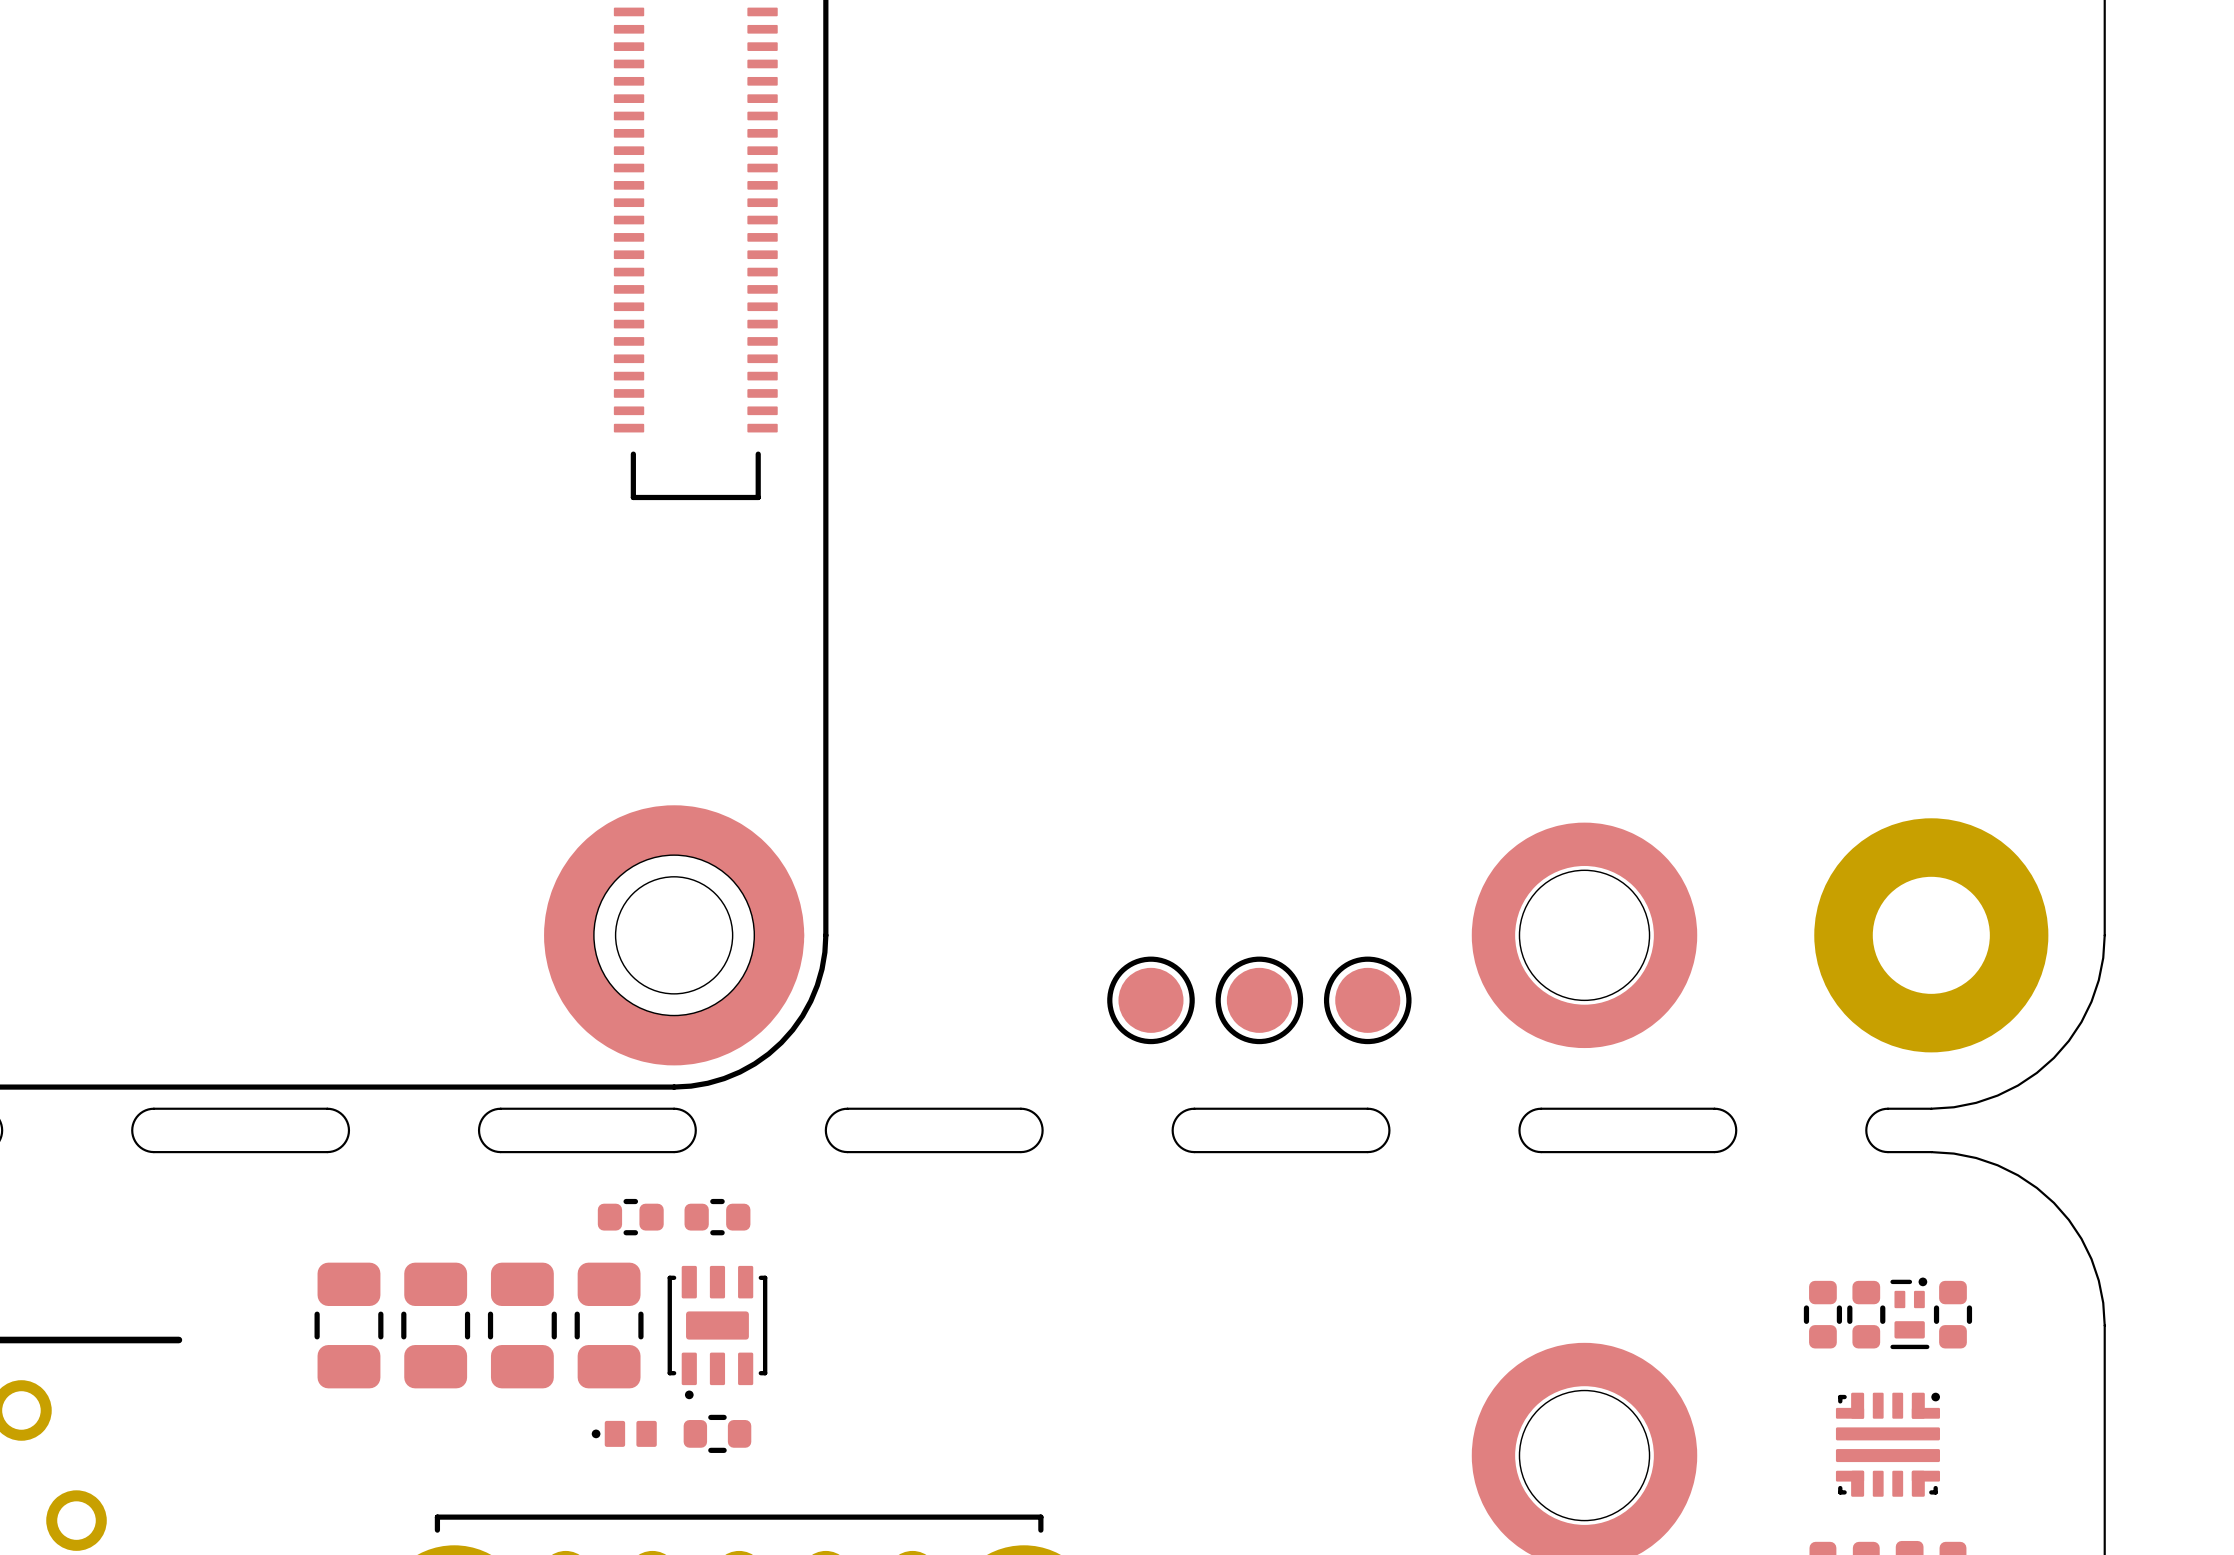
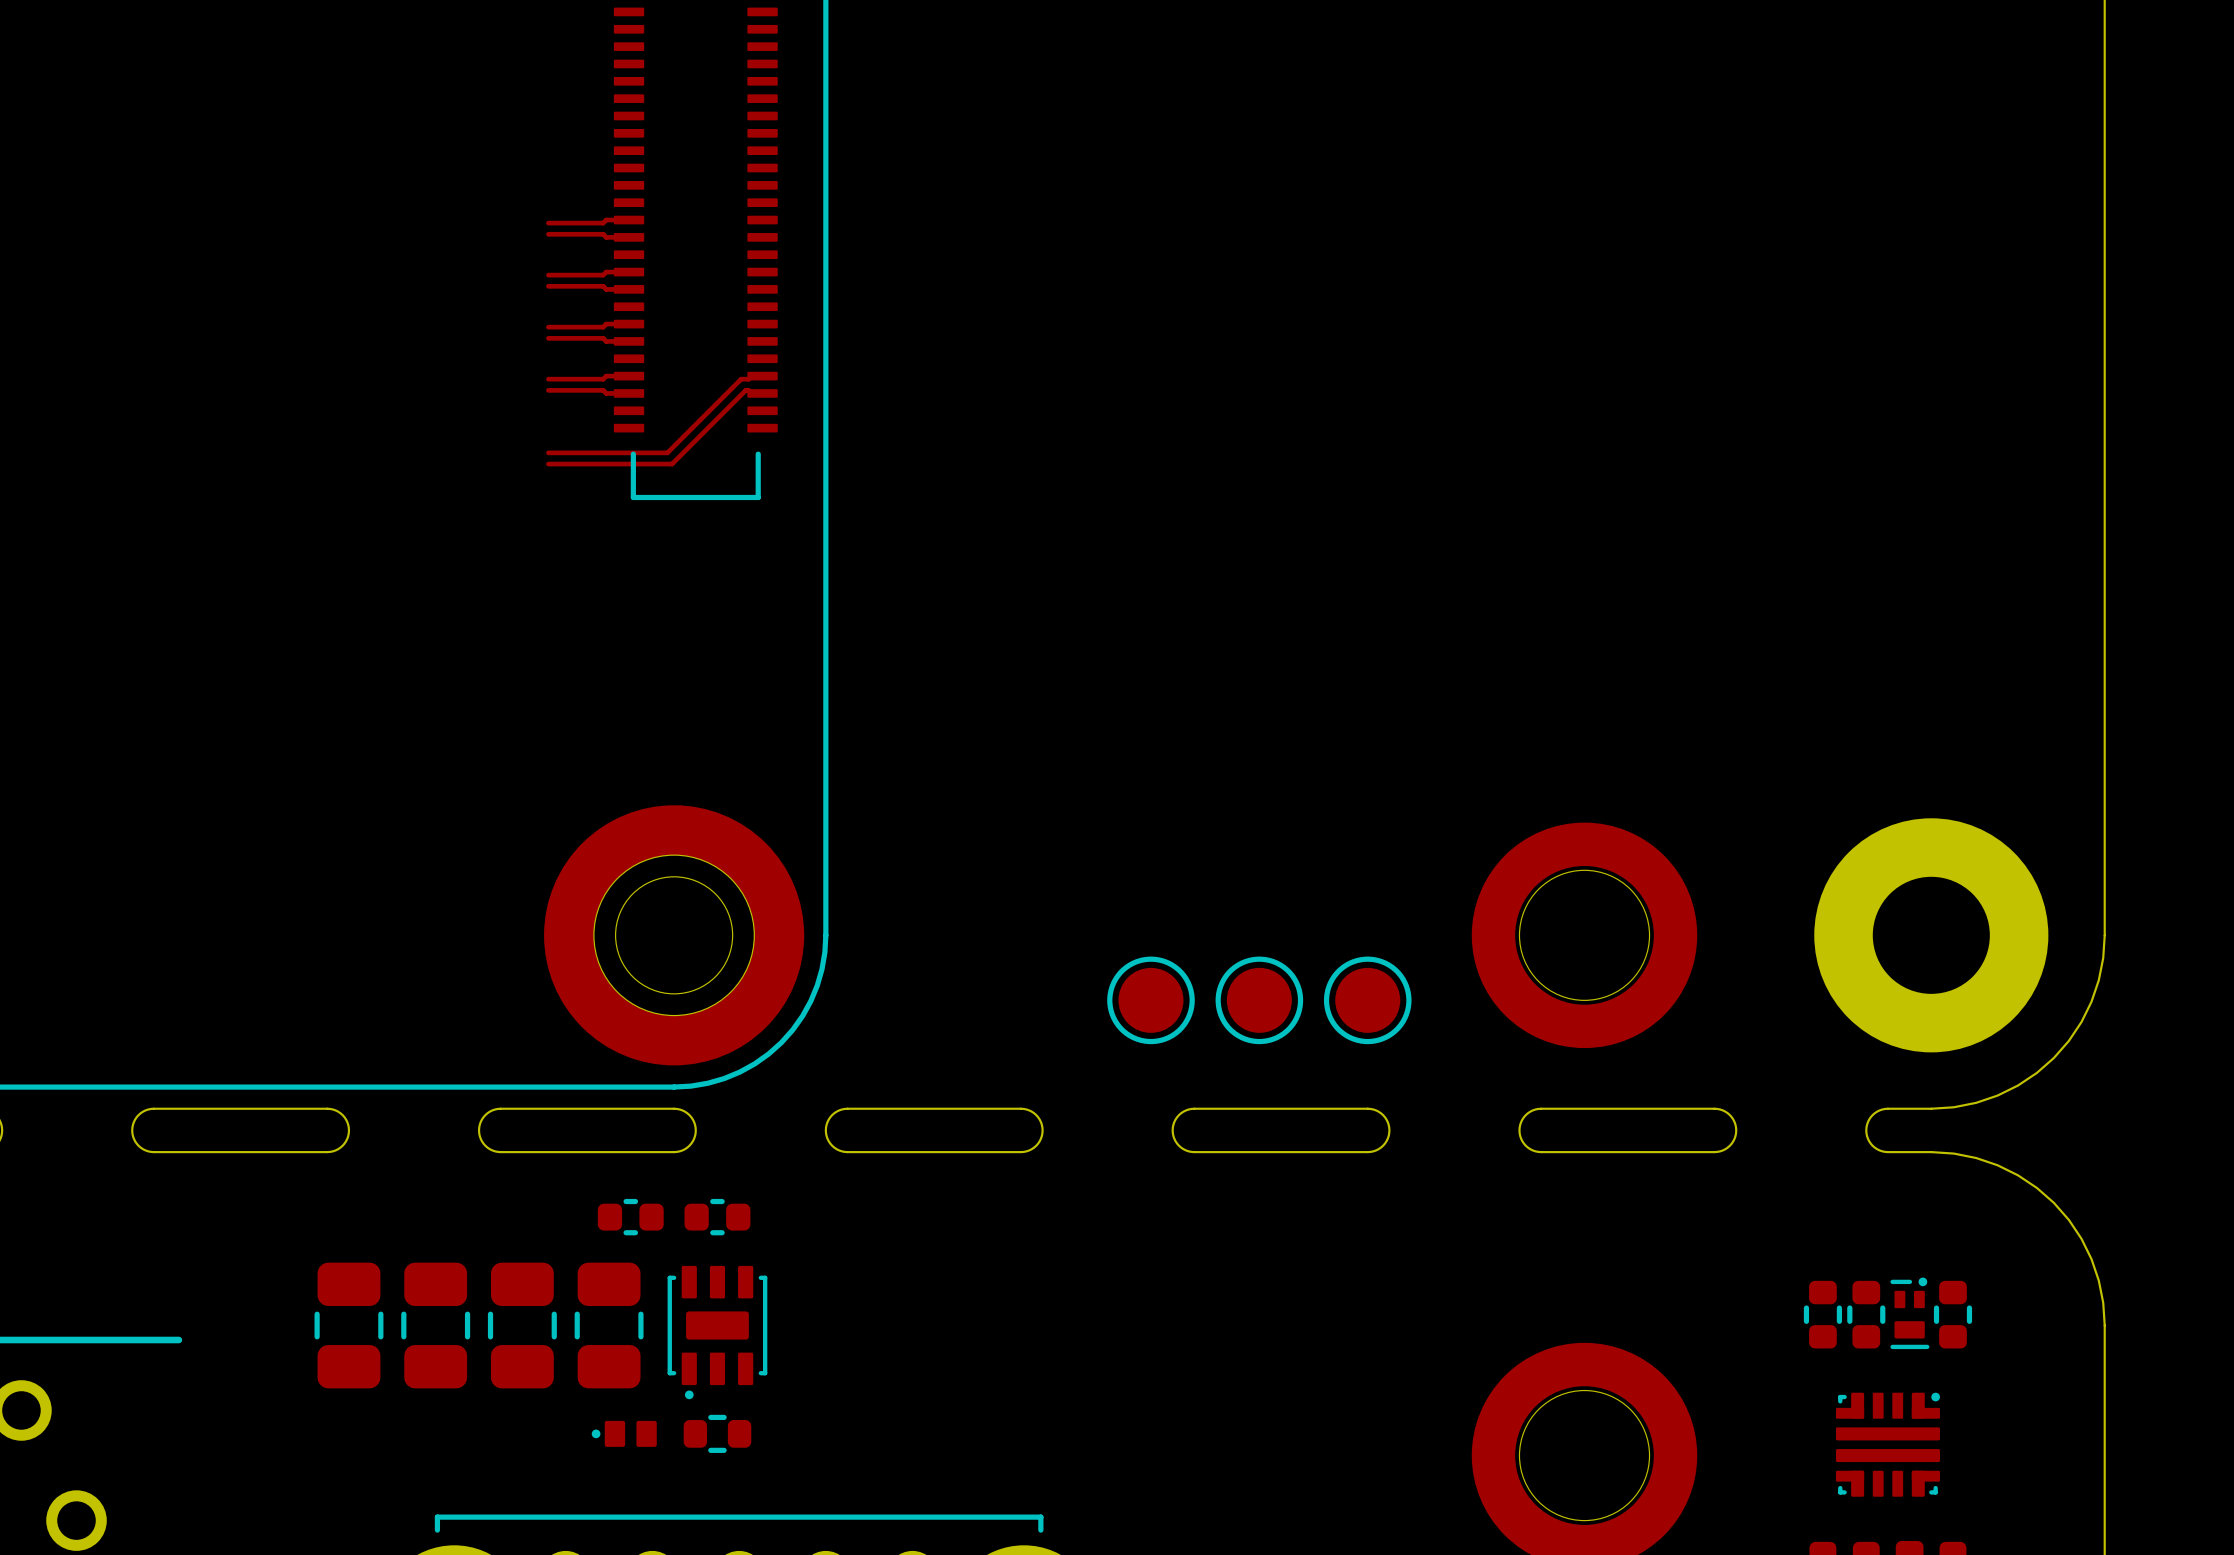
track: none -> (629, 220) (606, 220) (603, 223) (548, 223)
track: none -> (548, 234) (603, 234) (606, 237) (629, 237)
track: none -> (629, 272) (606, 272) (603, 275) (548, 275)
track: none -> (548, 286) (603, 286) (606, 289) (629, 289)
track: none -> (629, 324) (606, 324) (603, 327) (548, 327)
track: none -> (548, 338) (603, 338) (606, 341) (629, 341)
track: none -> (629, 376) (606, 376) (603, 379) (548, 379)
track: none -> (762, 376) (751, 376) (748, 379) (741, 379) (667, 452) (548, 452)
track: none -> (548, 390) (603, 390) (606, 393) (629, 393)
track: none -> (762, 393) (751, 393) (745, 390) (672, 464) (548, 464)

